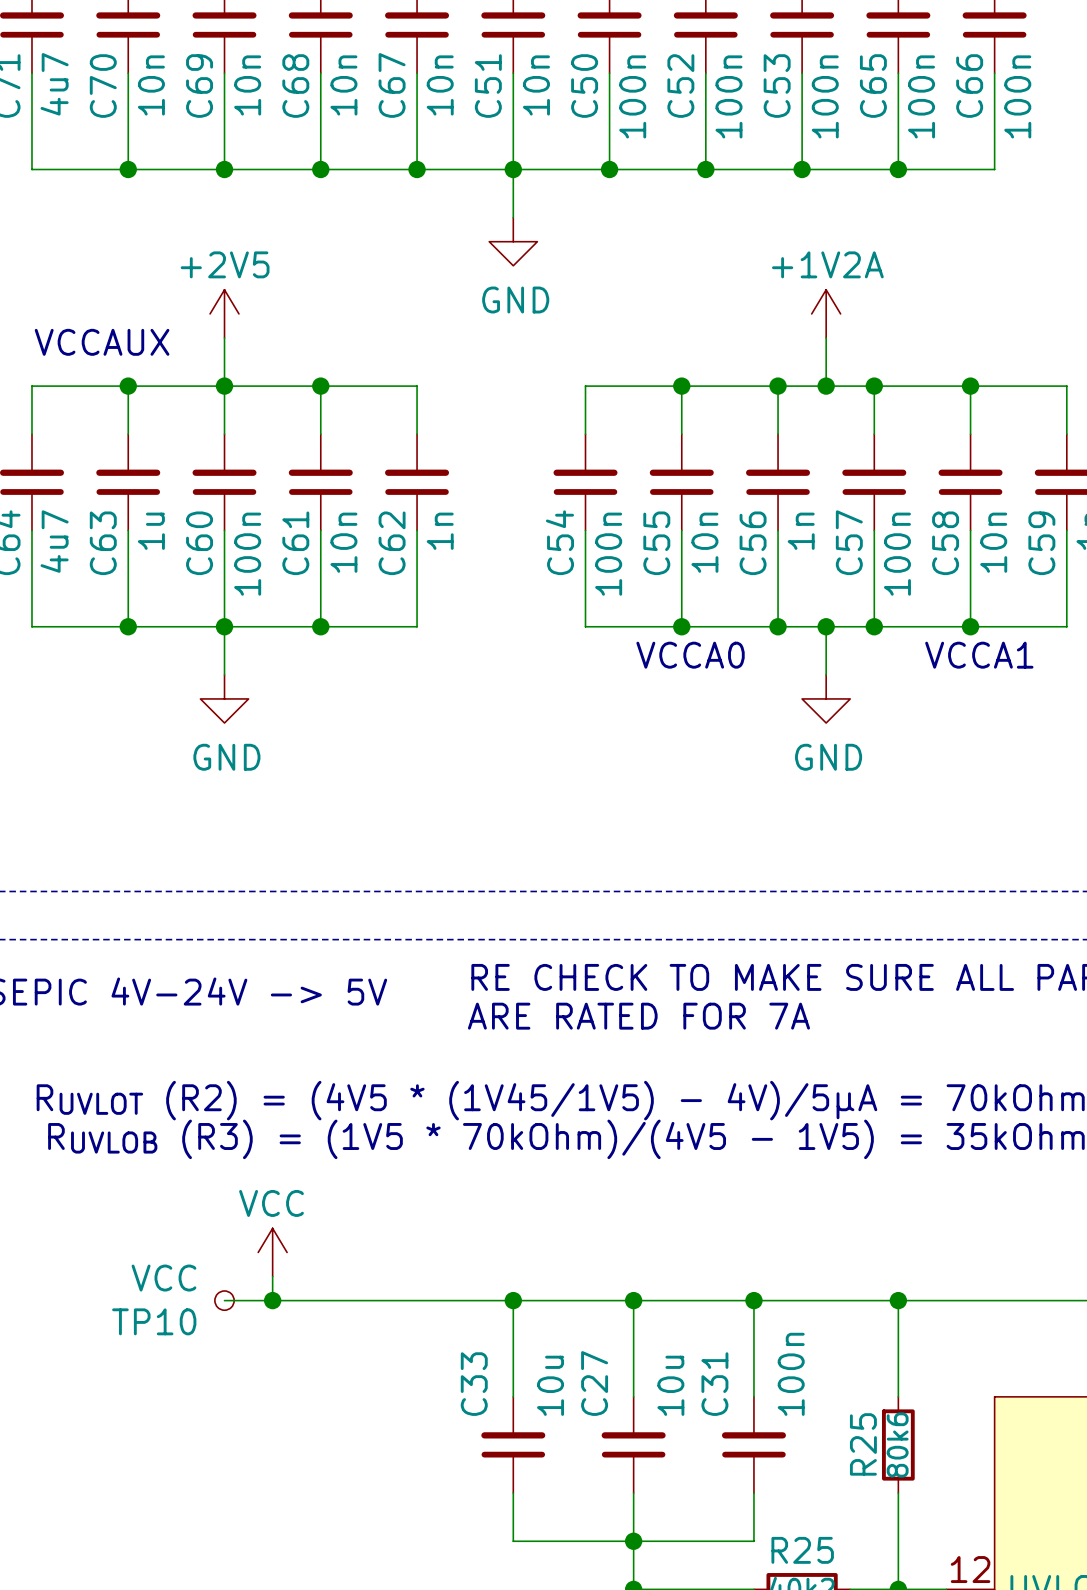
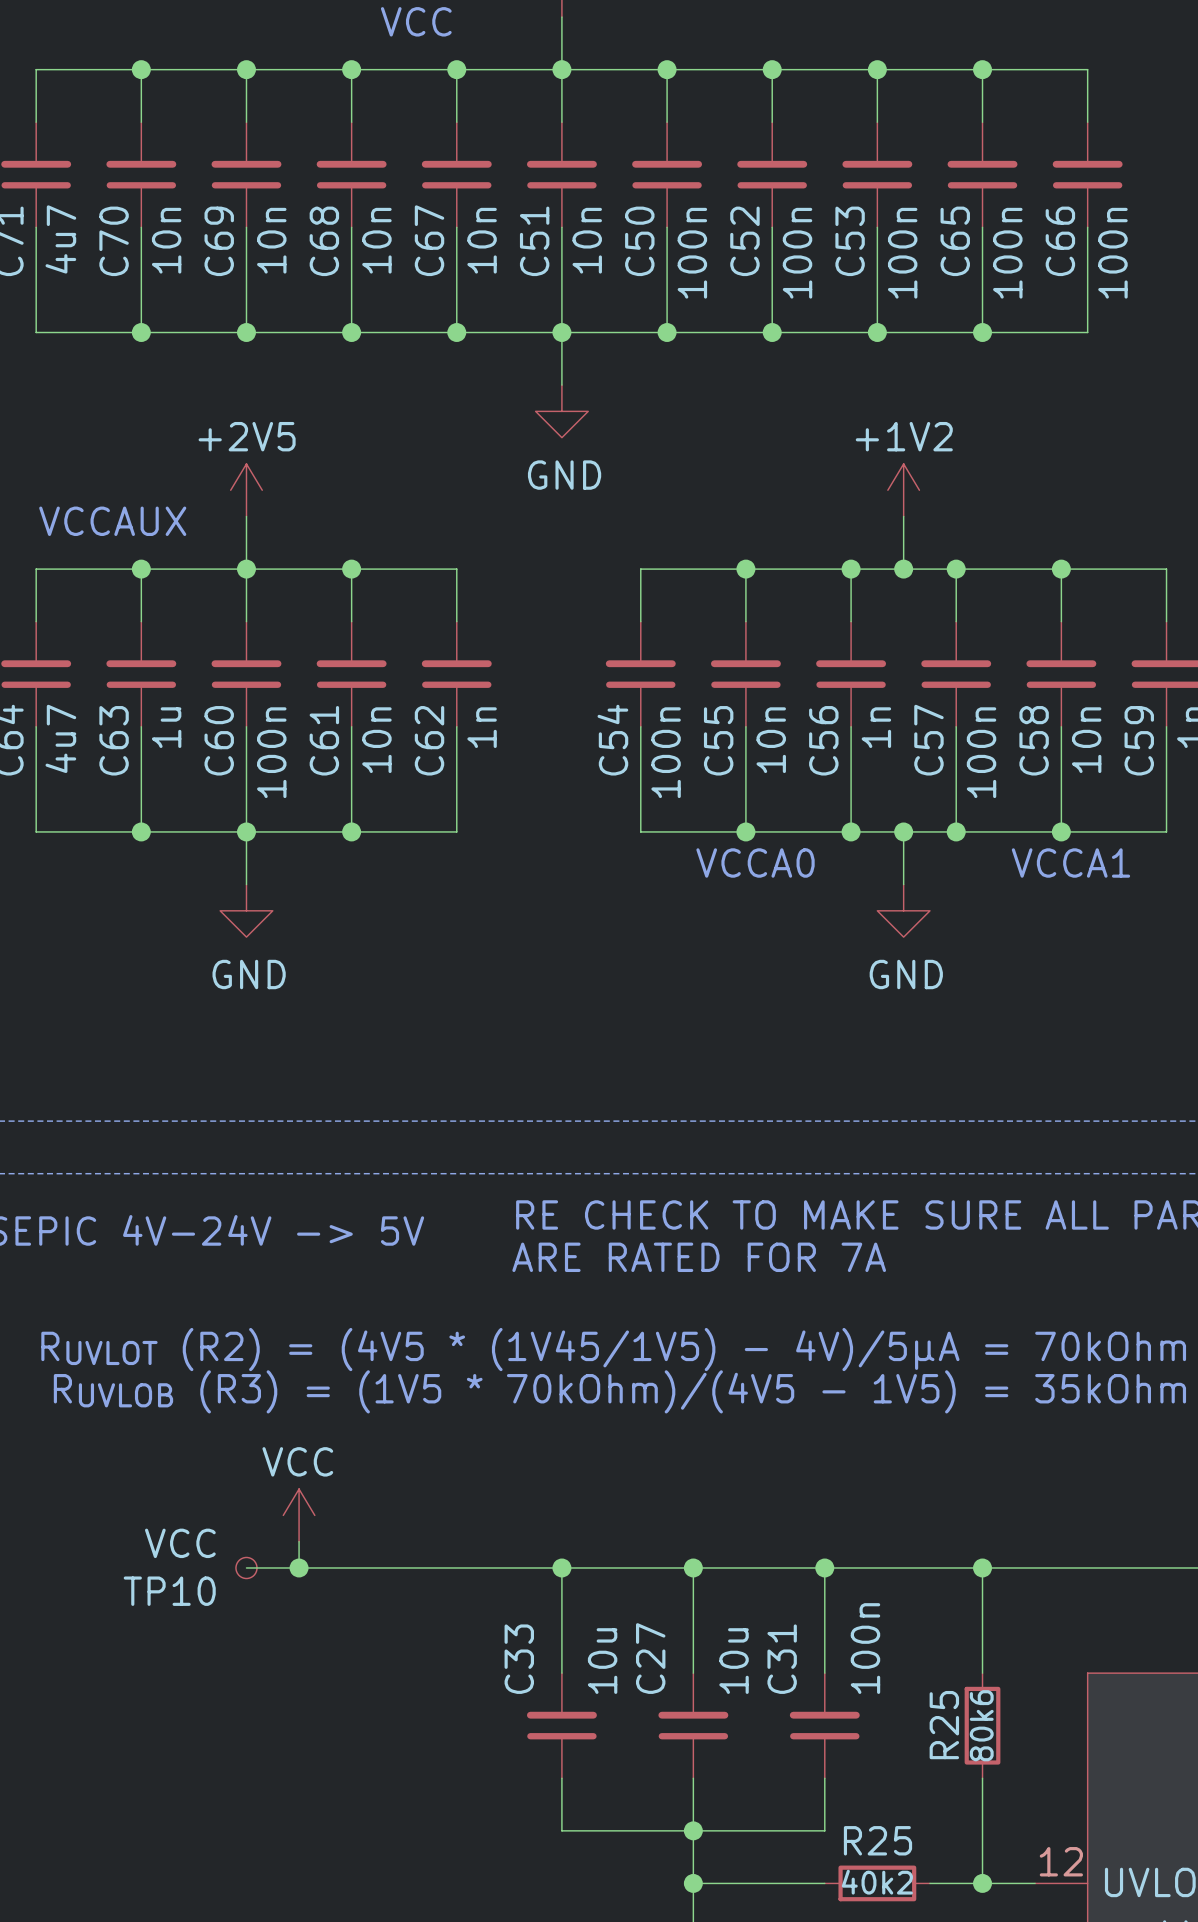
power symbol: +1V2A (826, 313) -> +1V2 (903, 490)

